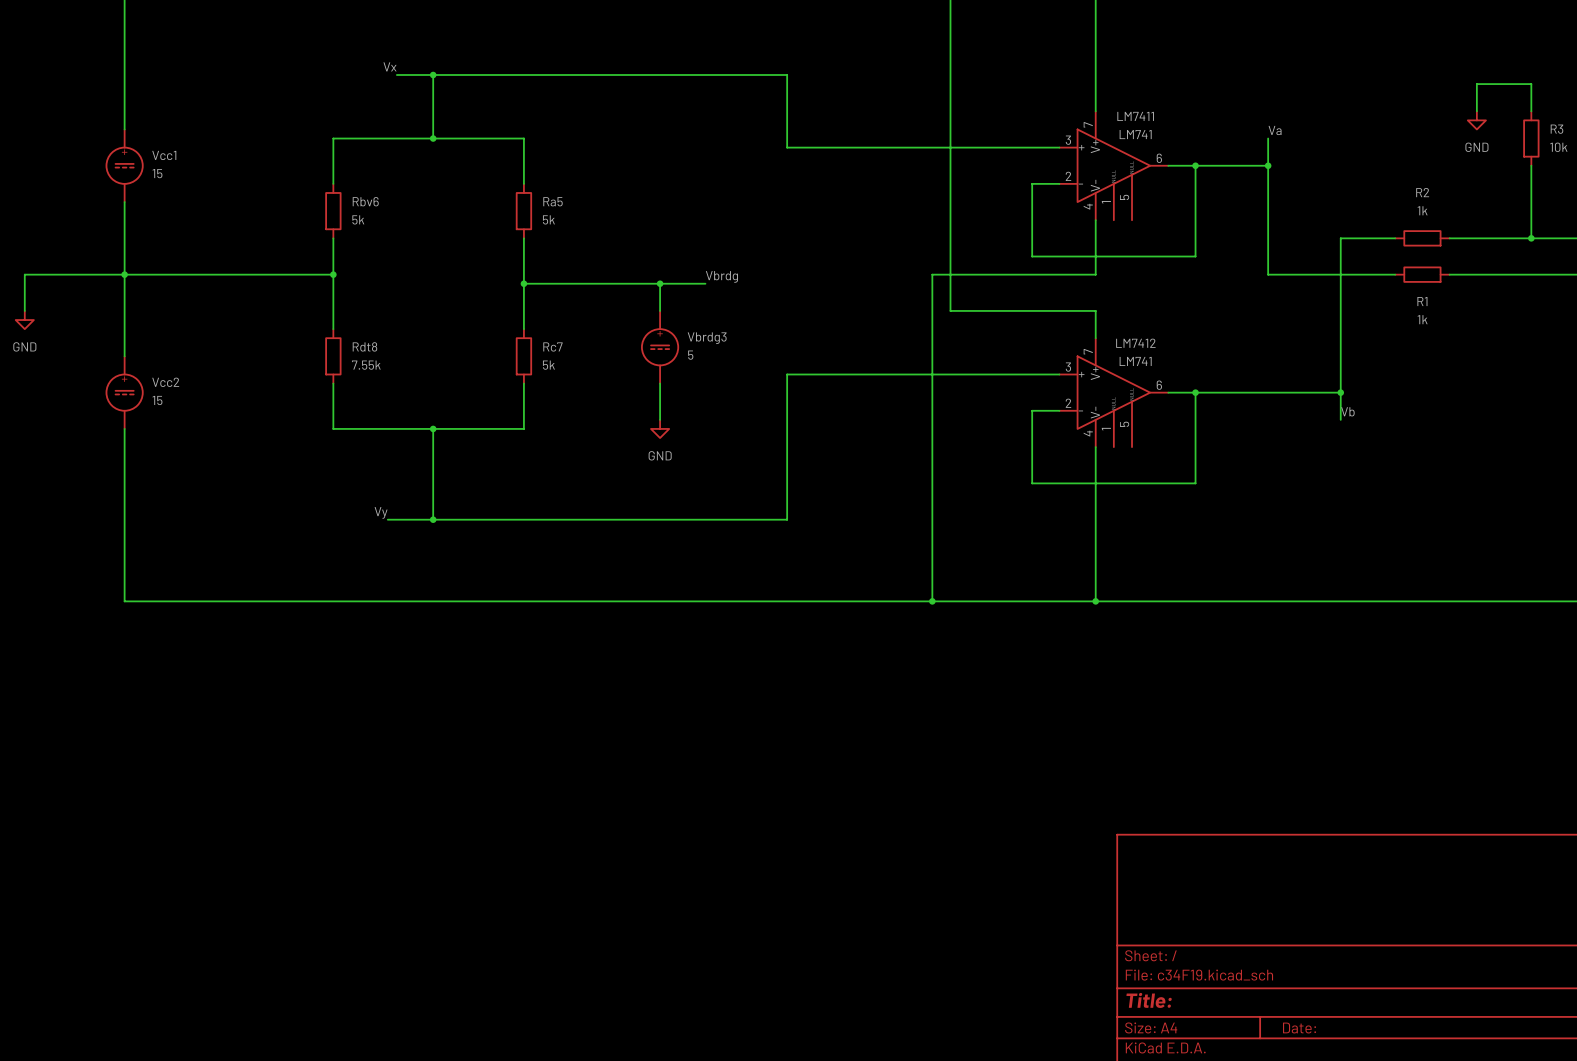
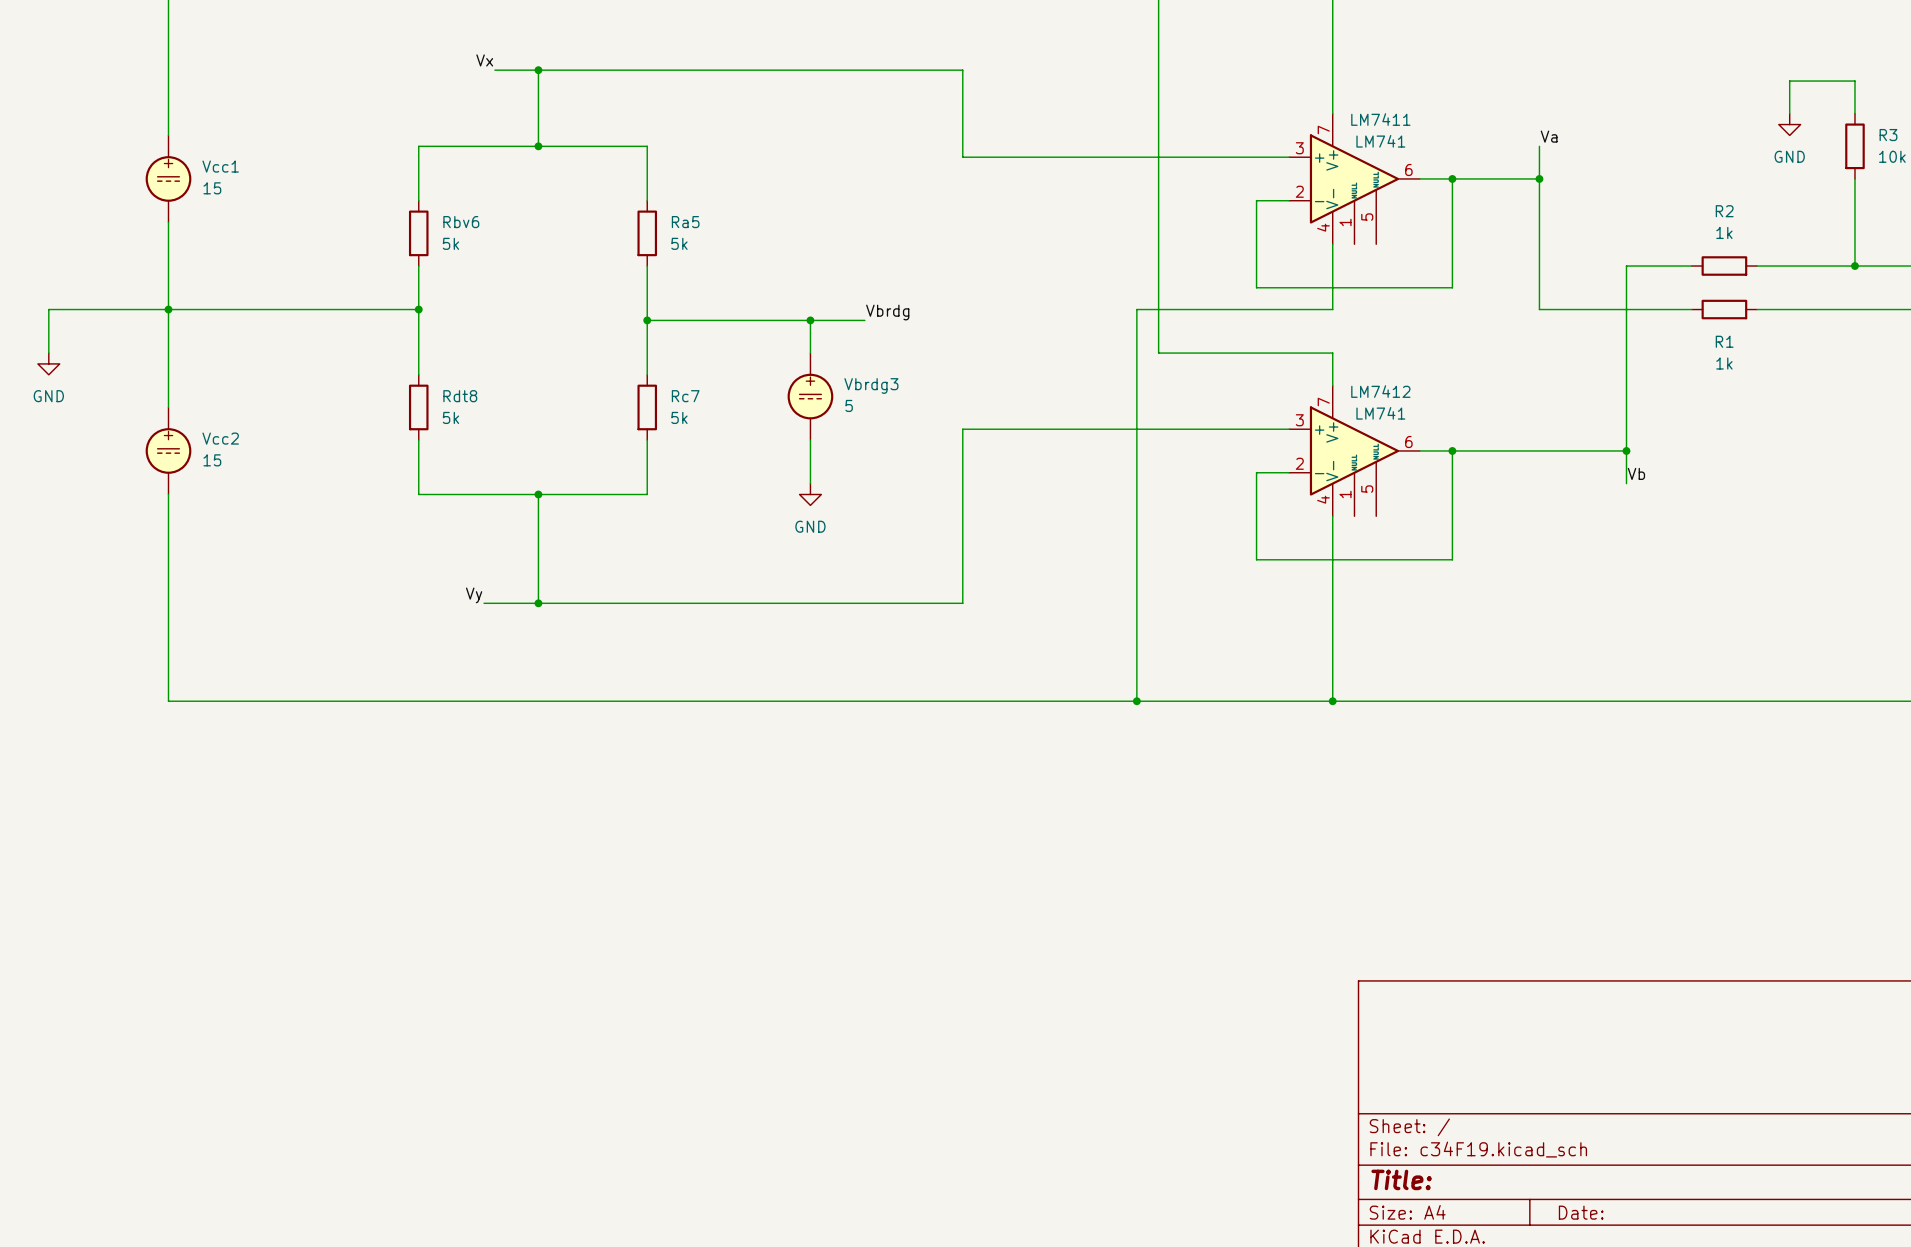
Rdt8 value: 7.55k (366, 365) -> 5k (450, 417)

